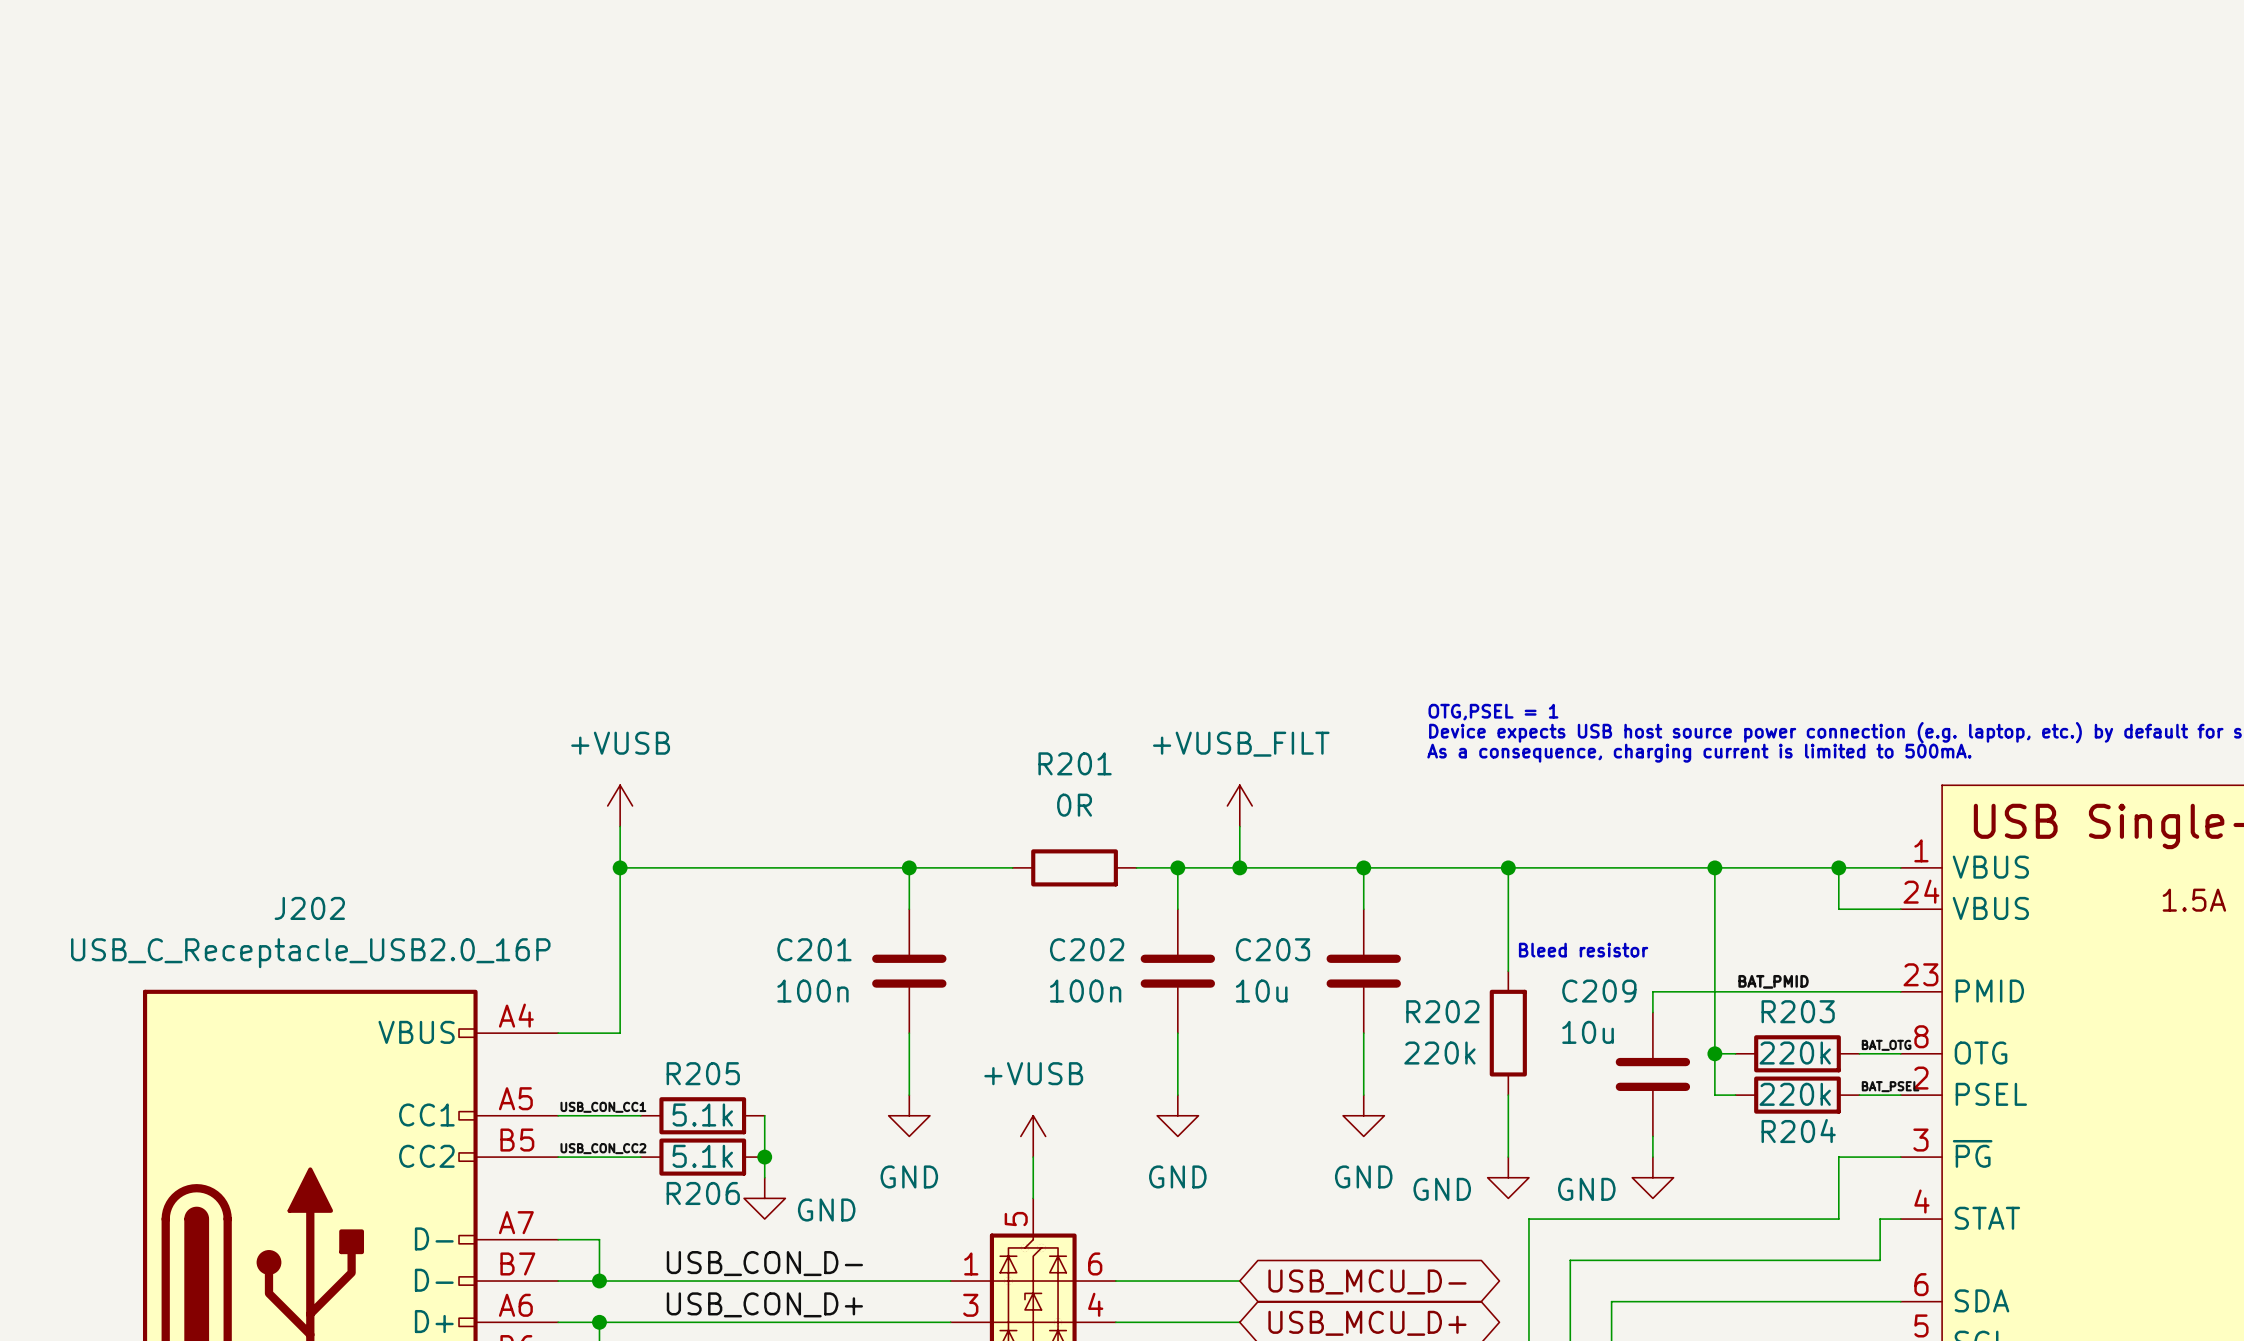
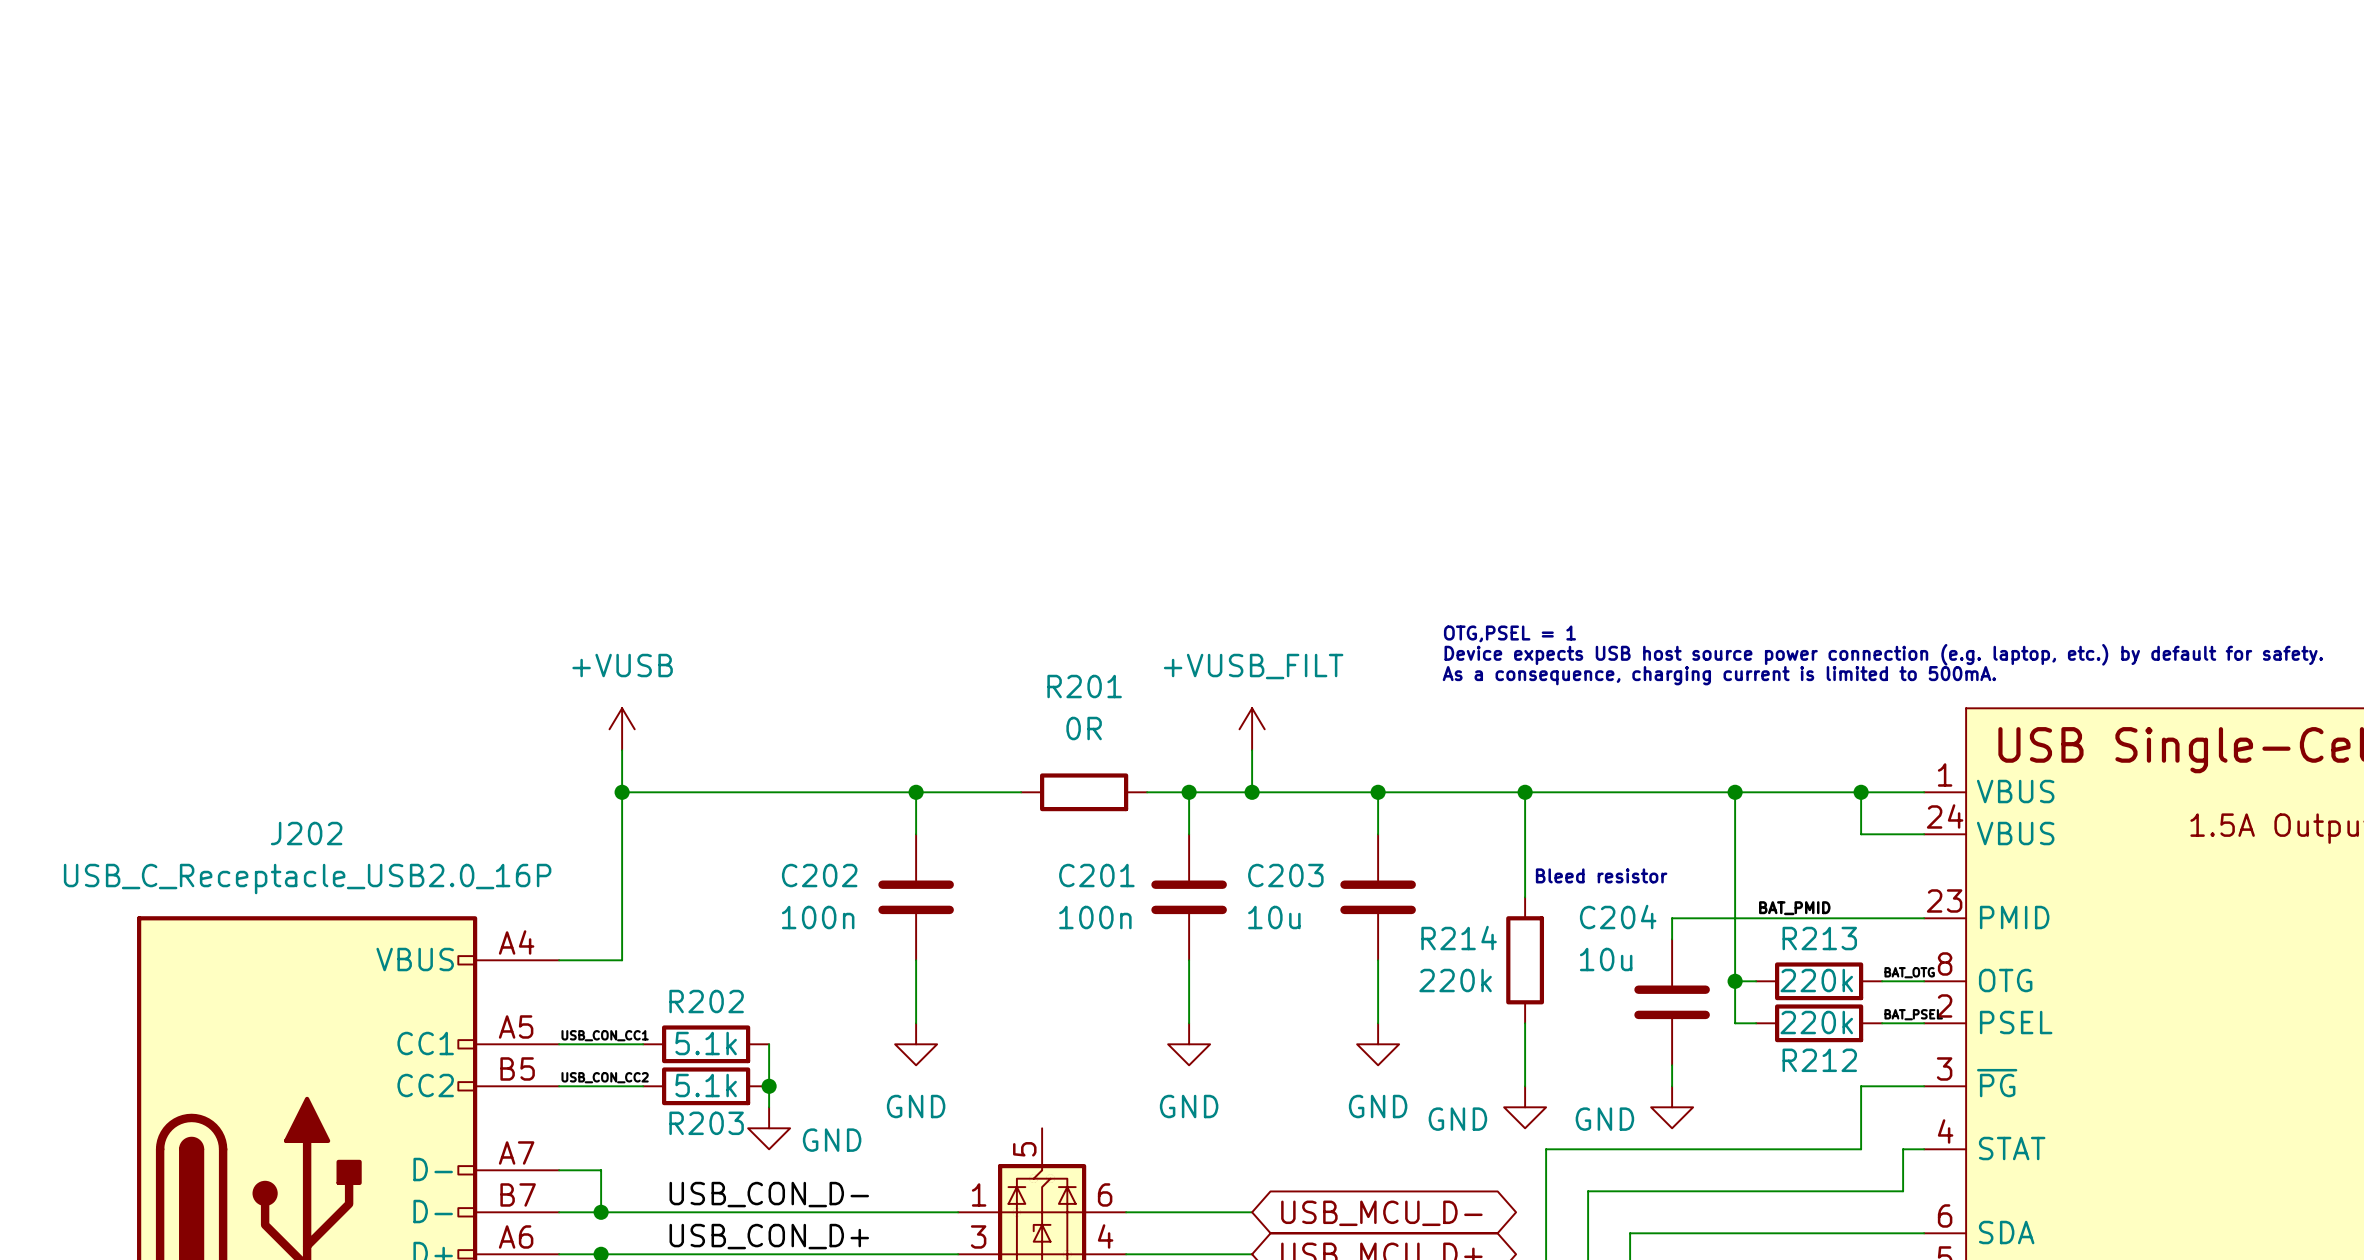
C201 name: C201 (814, 949) -> C202 (819, 875)
C202 name: C202 (1087, 949) -> C201 (1096, 875)
C209 name: C209 (1599, 991) -> C204 (1618, 917)
R202 name: R202 (1442, 1011) -> R214 (1459, 938)
R203 name: R203 (1798, 1011) -> R213 (1819, 938)
R205 name: R205 (703, 1073) -> R202 (706, 1001)
R204 name: R204 (1798, 1131) -> R212 (1819, 1060)
power symbol: +VUSB (1033, 1136) -> none
wire: (1033, 1157) (1033, 1198) -> none
R206 name: R206 (703, 1193) -> R203 (706, 1123)

